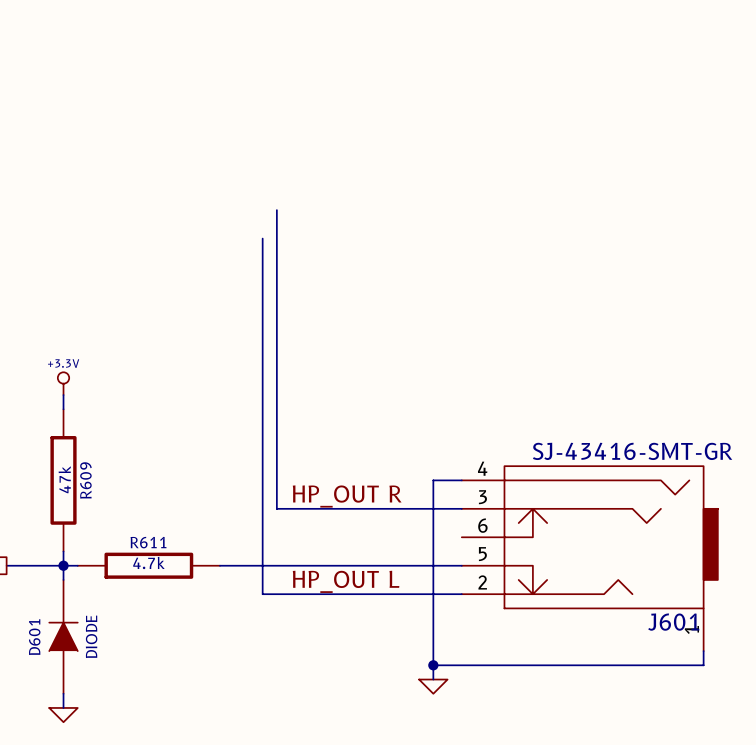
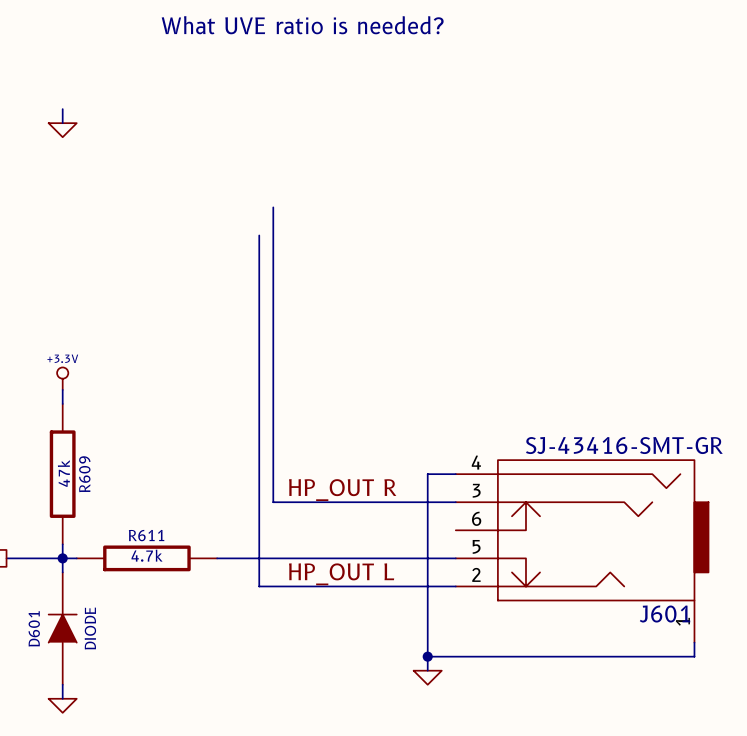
text: none -> What UVE ratio is needed? (302, 25)
wire: none -> (62, 109) (62, 123)
power symbol: none -> (62, 130)

